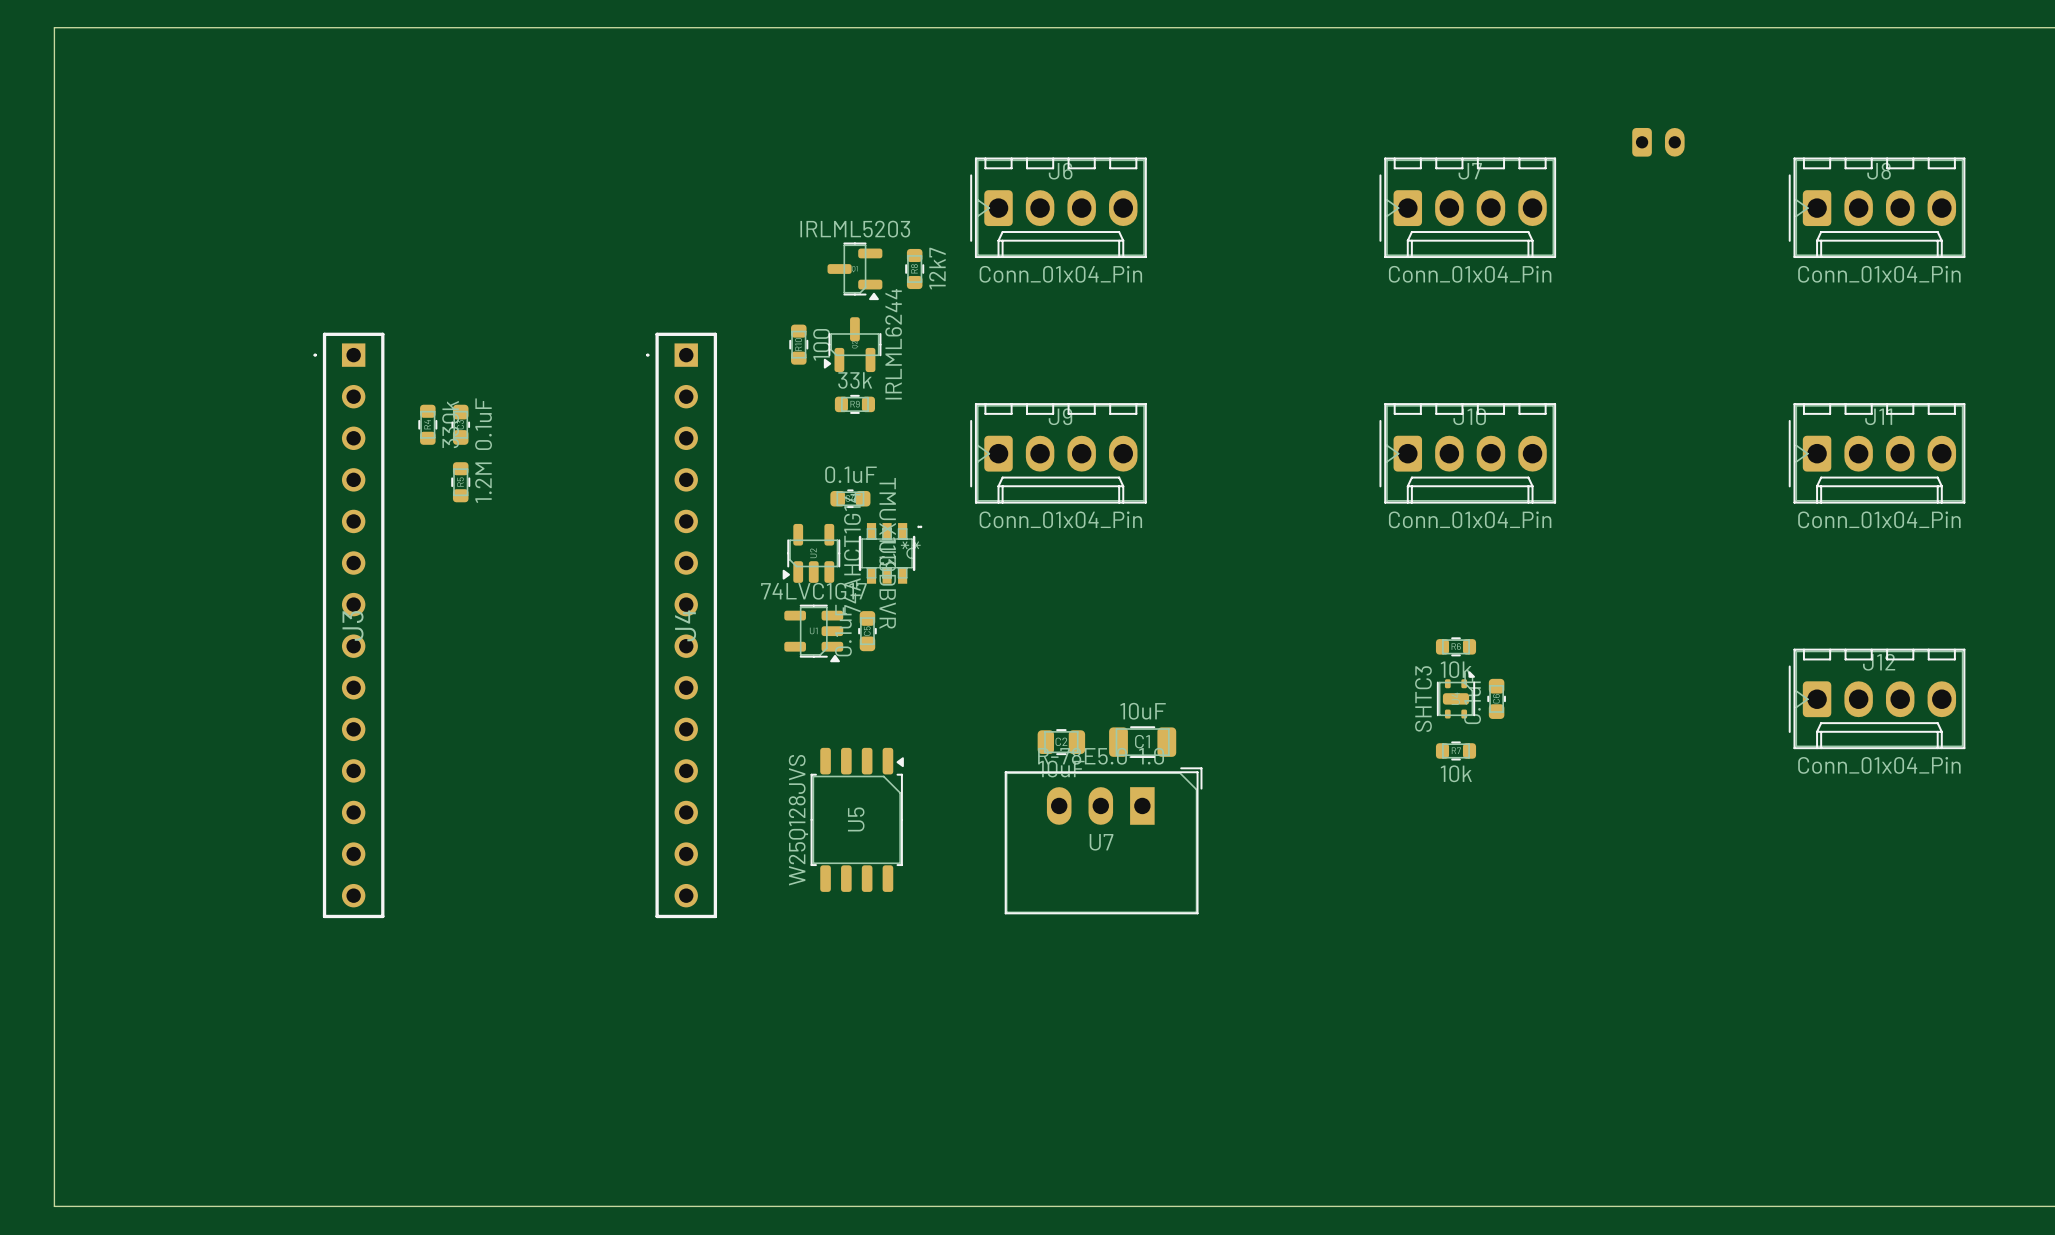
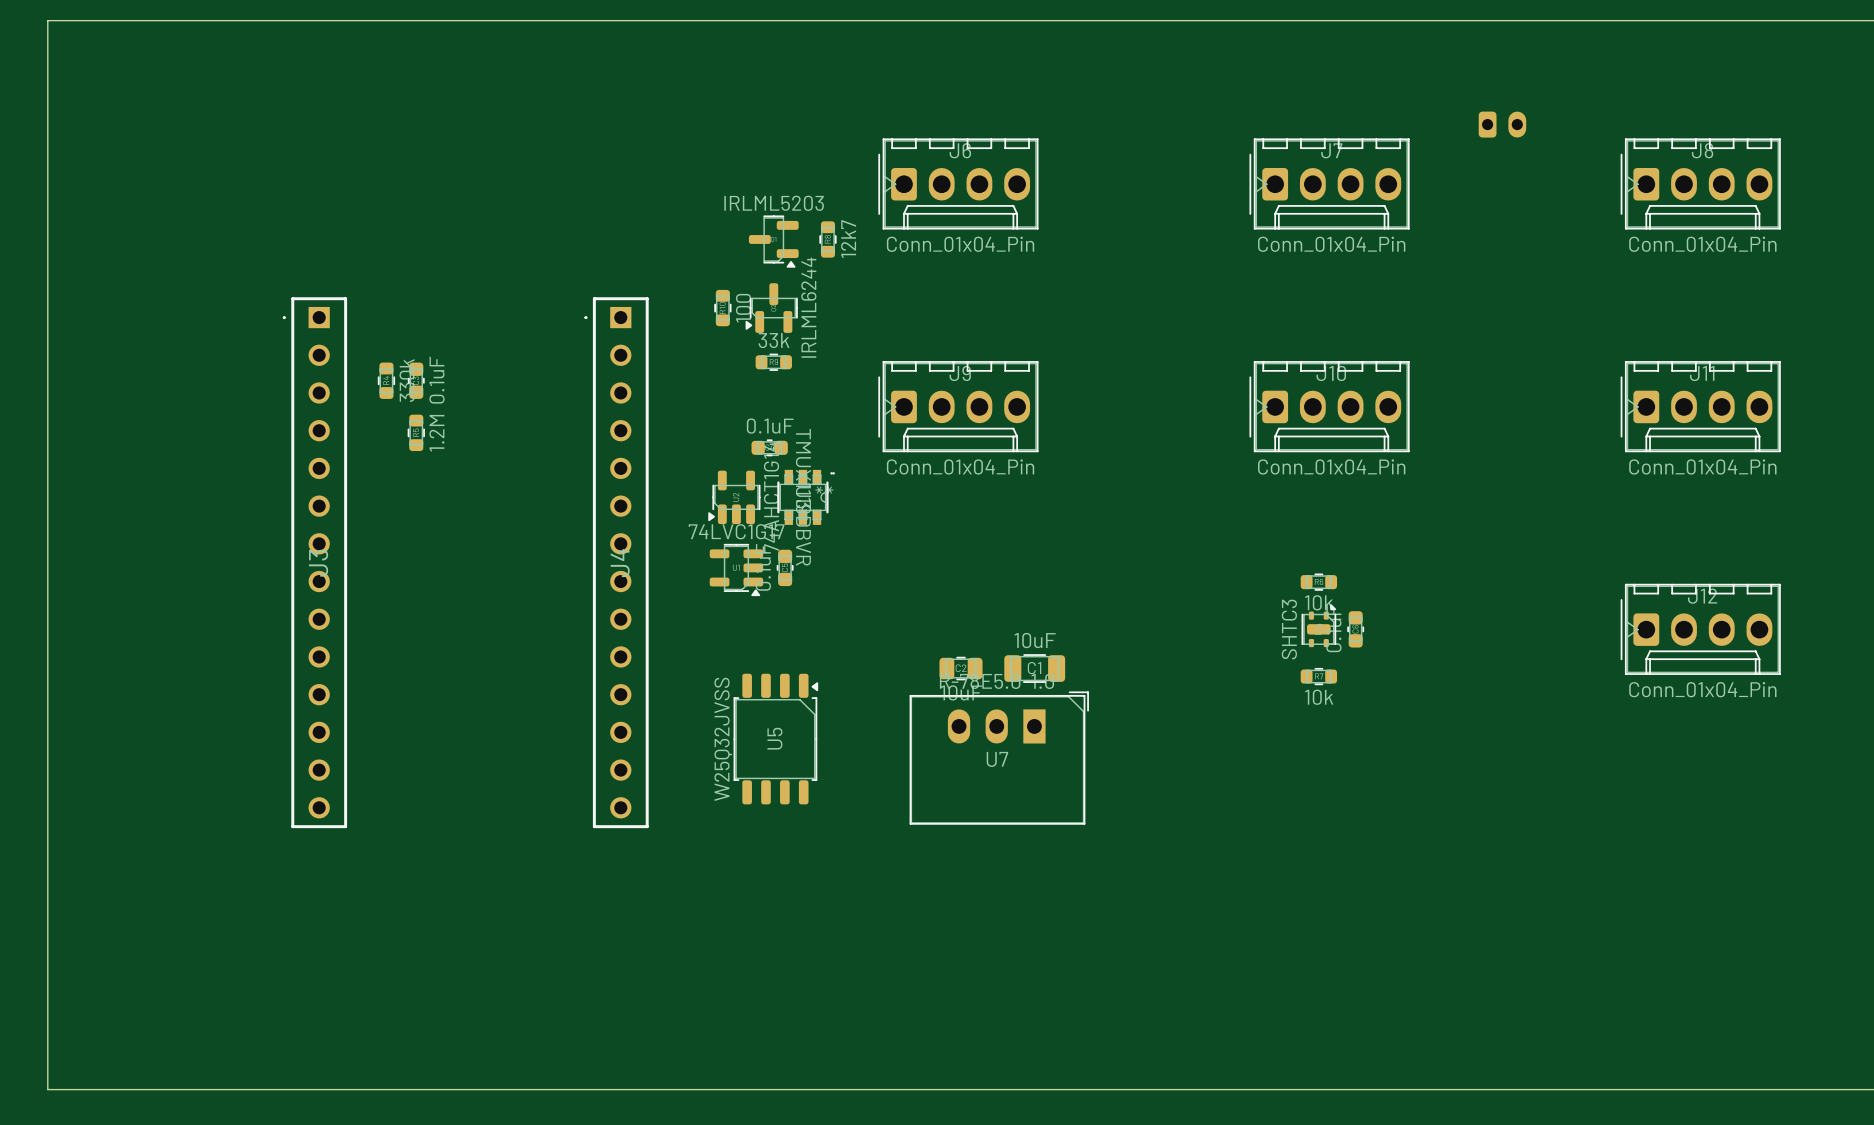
U5 value: W25Q128JVS (798, 820) -> W25Q32JVSS (723, 739)

